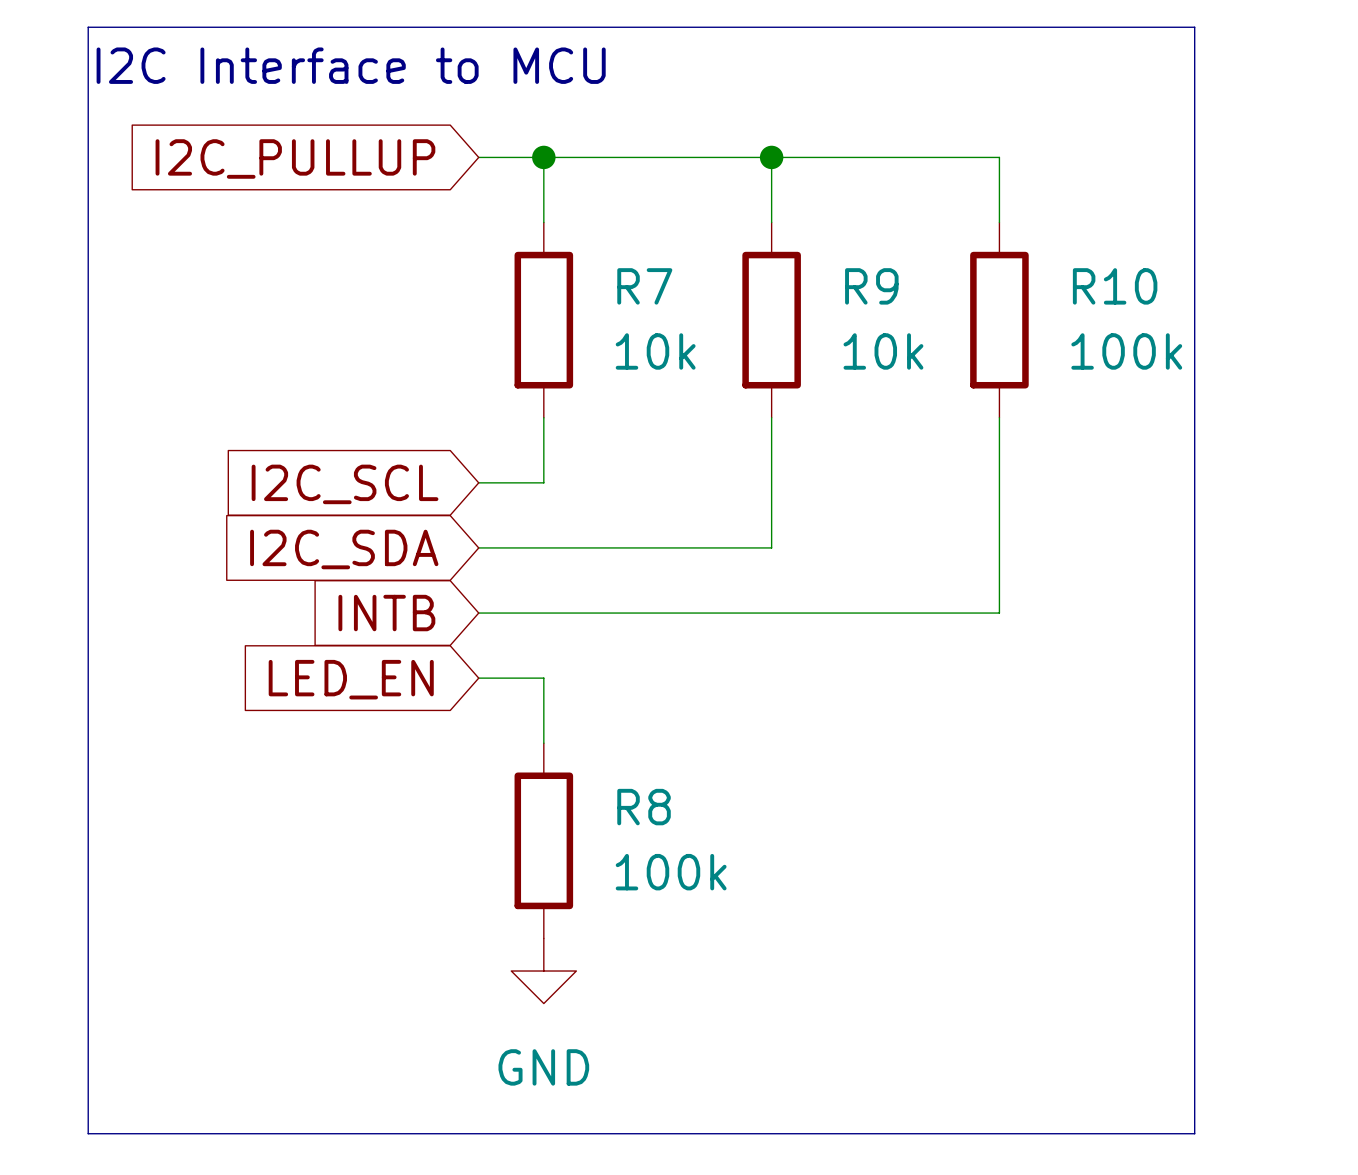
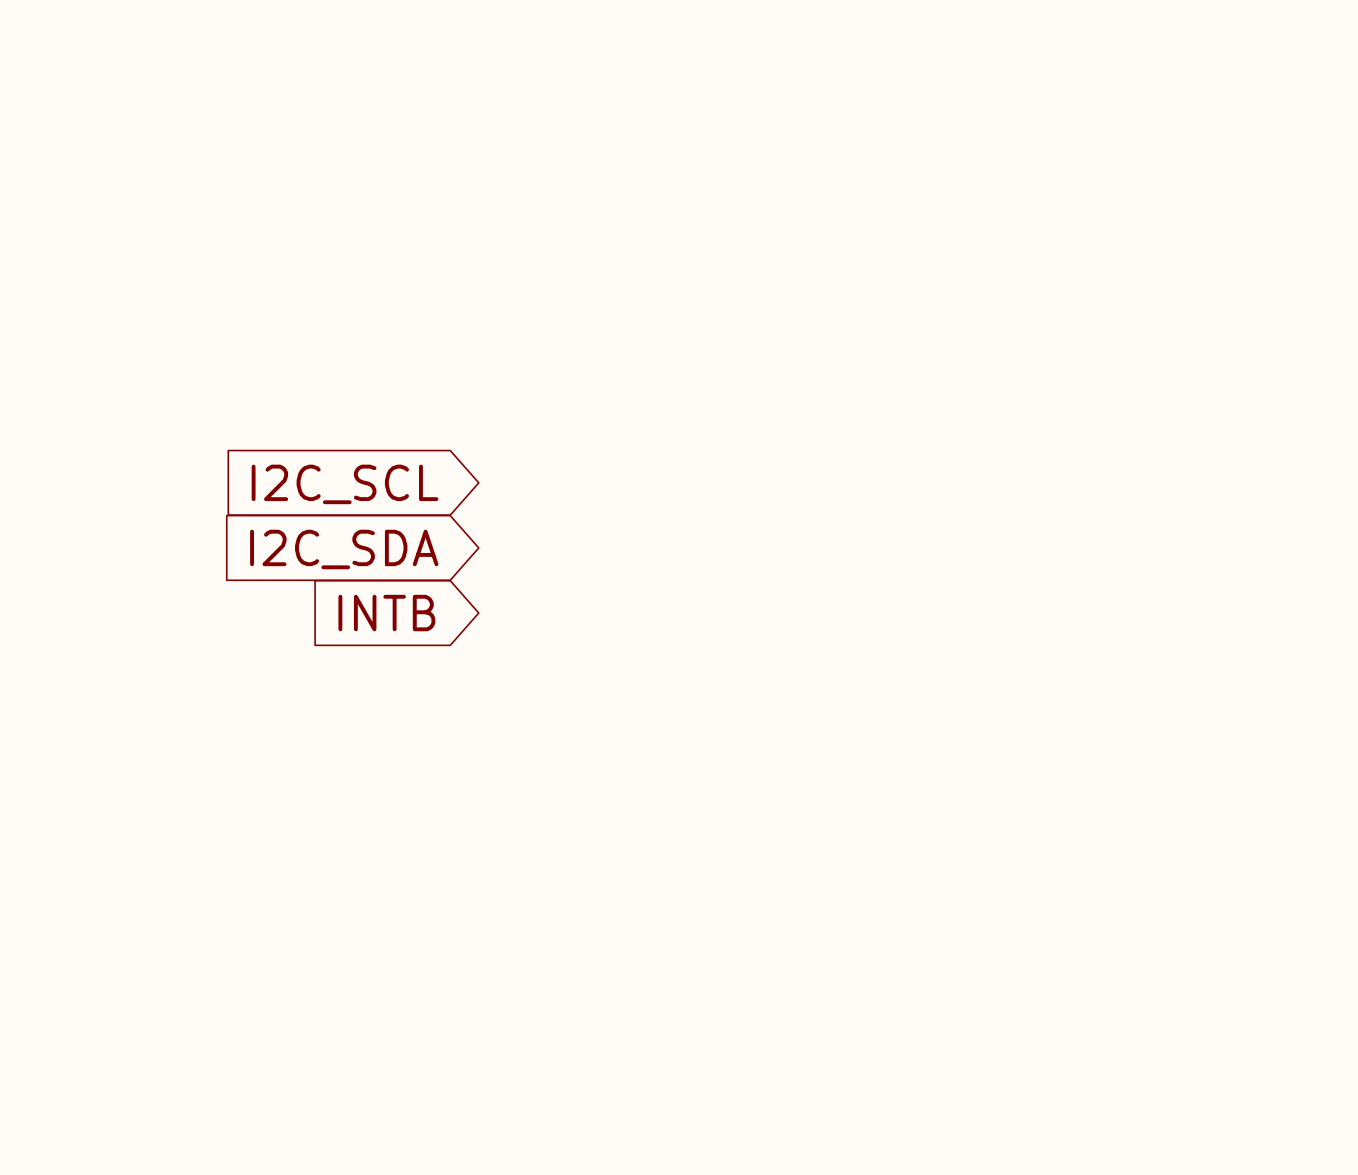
line: (88, 27) (88, 1133) (1194, 1133) (1194, 27) (88, 27) -> none
text: I2C Interface to MCU (351, 65) -> none
wire: (478, 157) (999, 157) (999, 222) -> none
wire: (543, 157) (543, 222) -> none
junction: (543, 157) -> none
wire: (771, 157) (771, 222) -> none
junction: (771, 157) -> none
global label: I2C_PULLUP (295, 158) -> none
R7: 10k (543, 320) -> none
R9: 10k (771, 320) -> none
R10: 100k (999, 320) -> none
wire: (543, 417) (543, 482) (478, 482) -> none
wire: (771, 417) (771, 547) (478, 547) -> none
wire: (999, 417) (999, 613) (478, 613) -> none
wire: (478, 678) (543, 678) (543, 743) -> none
global label: LED_EN (351, 679) -> none
R8: 100k (543, 840) -> none
power symbol: GND (543, 971) -> none

